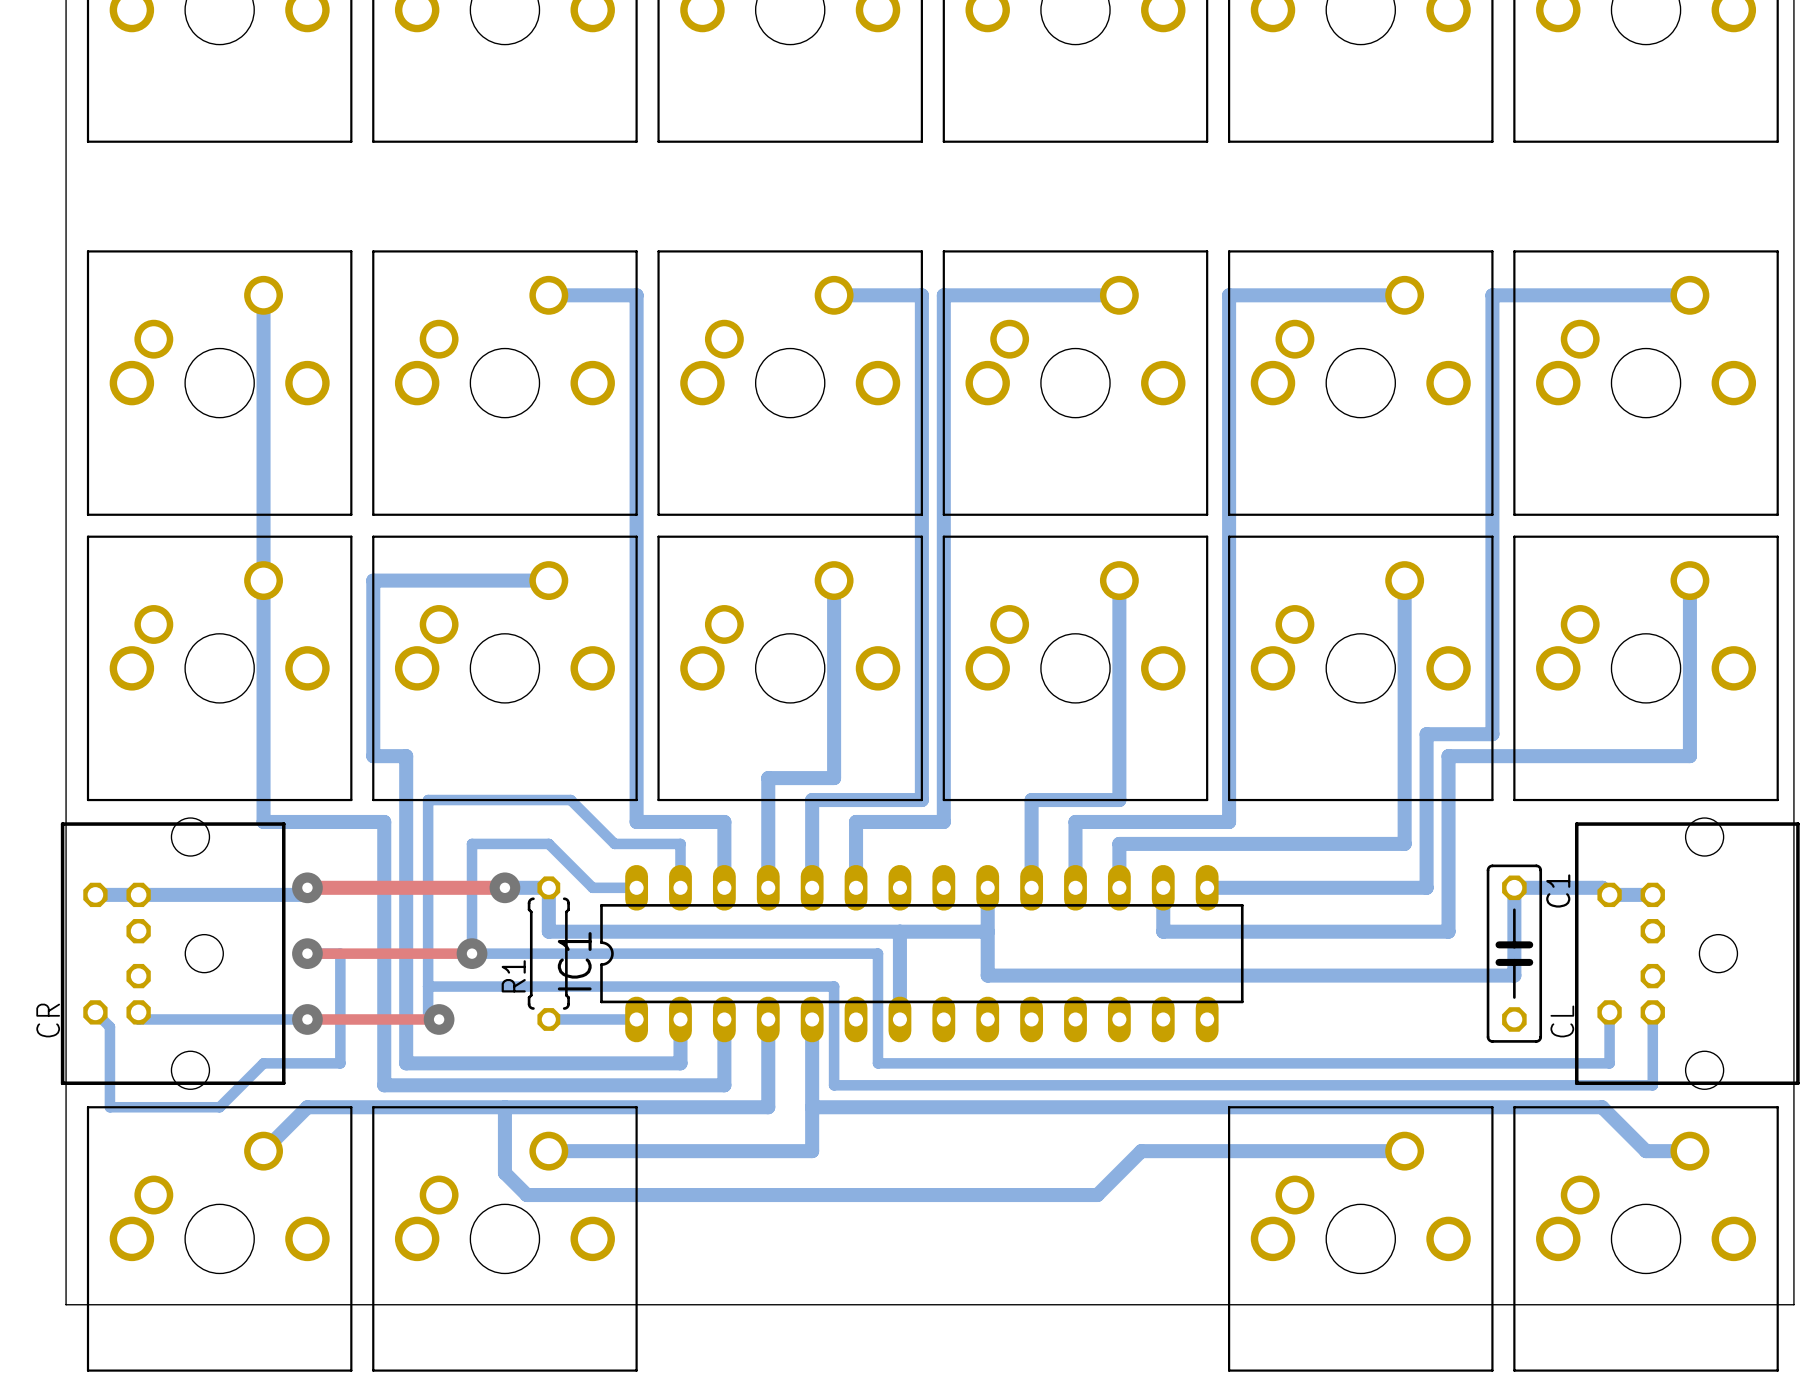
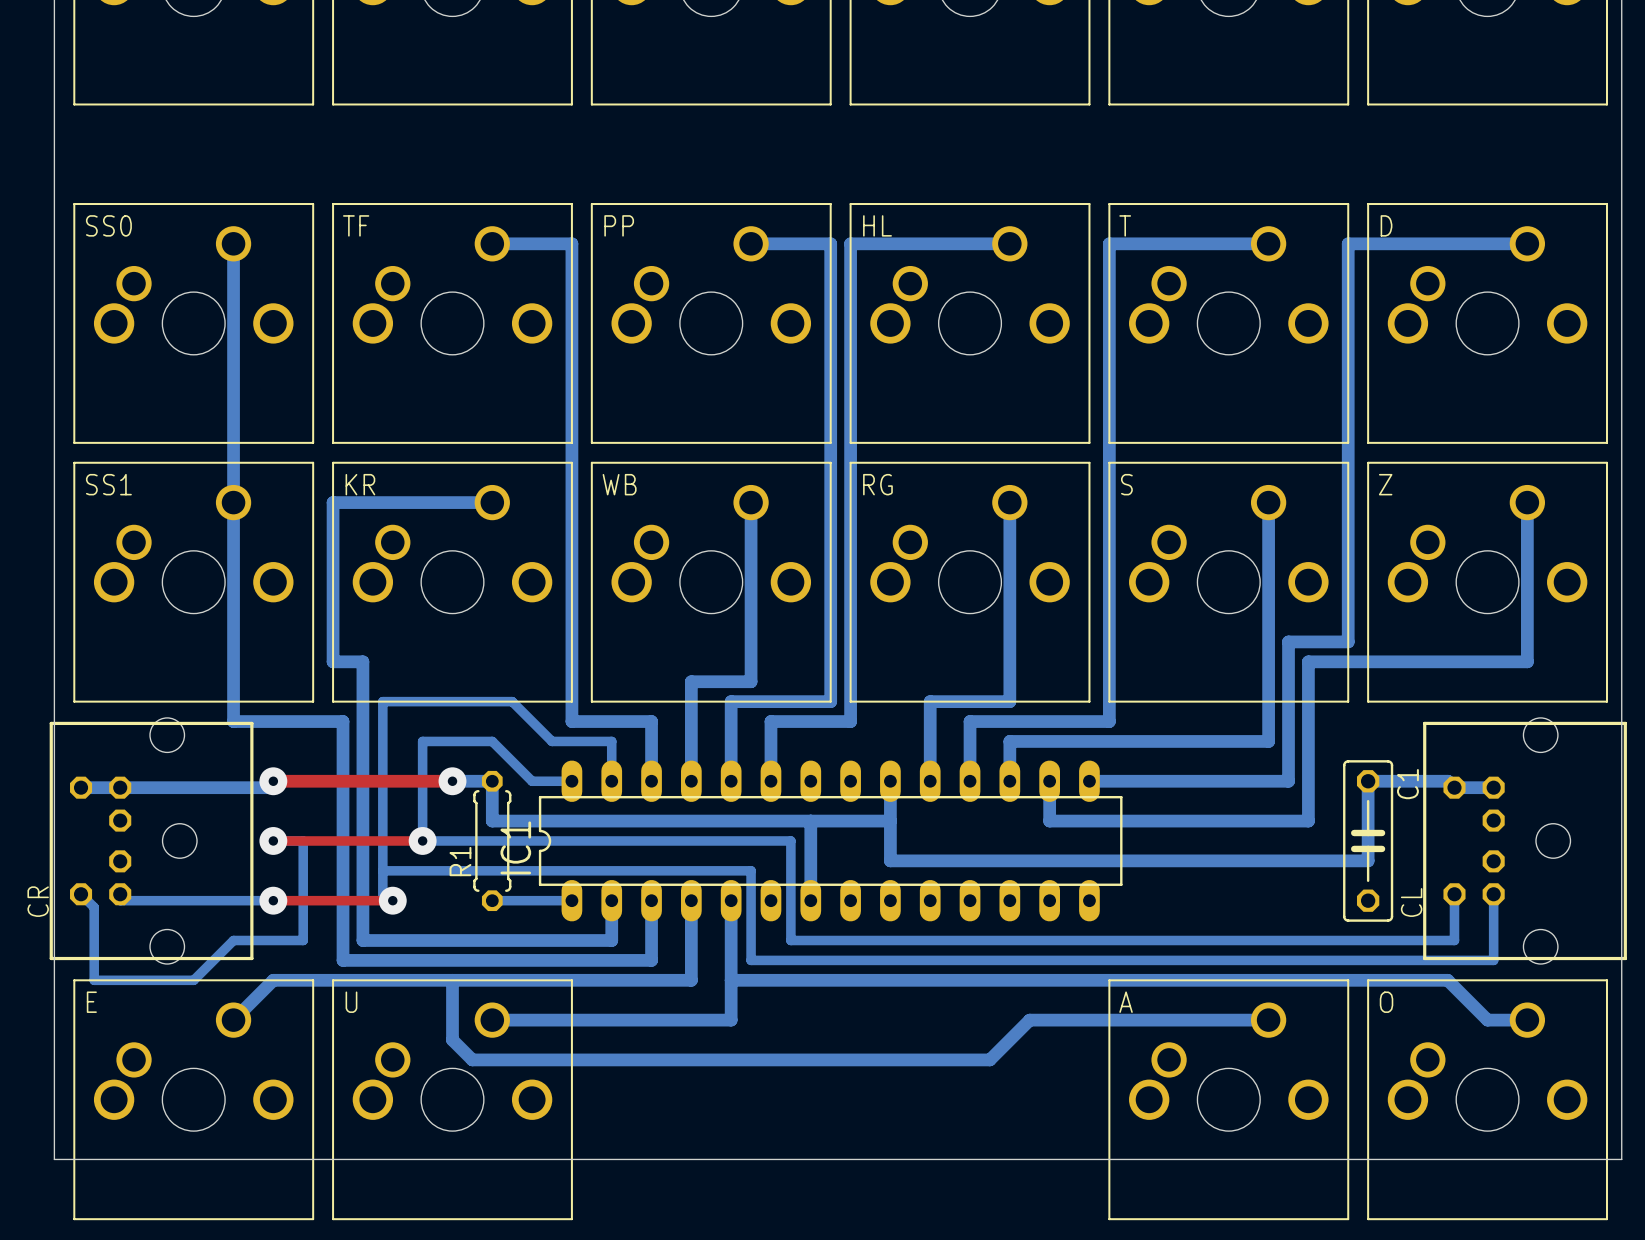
SS0 name: none -> SS0 (108, 225)
TF name: none -> TF (356, 225)
PP name: none -> PP (619, 225)
HL name: none -> HL (877, 225)
T name: none -> T (1125, 225)
D name: none -> D (1386, 225)
SS1 name: none -> SS1 (108, 484)
KR name: none -> KR (360, 484)
WB name: none -> WB (619, 484)
RG name: none -> RG (877, 484)
S name: none -> S (1126, 484)
Z name: none -> Z (1385, 484)
E name: none -> E (91, 1002)
U name: none -> U (351, 1002)
A name: none -> A (1126, 1002)
O name: none -> O (1386, 1002)

